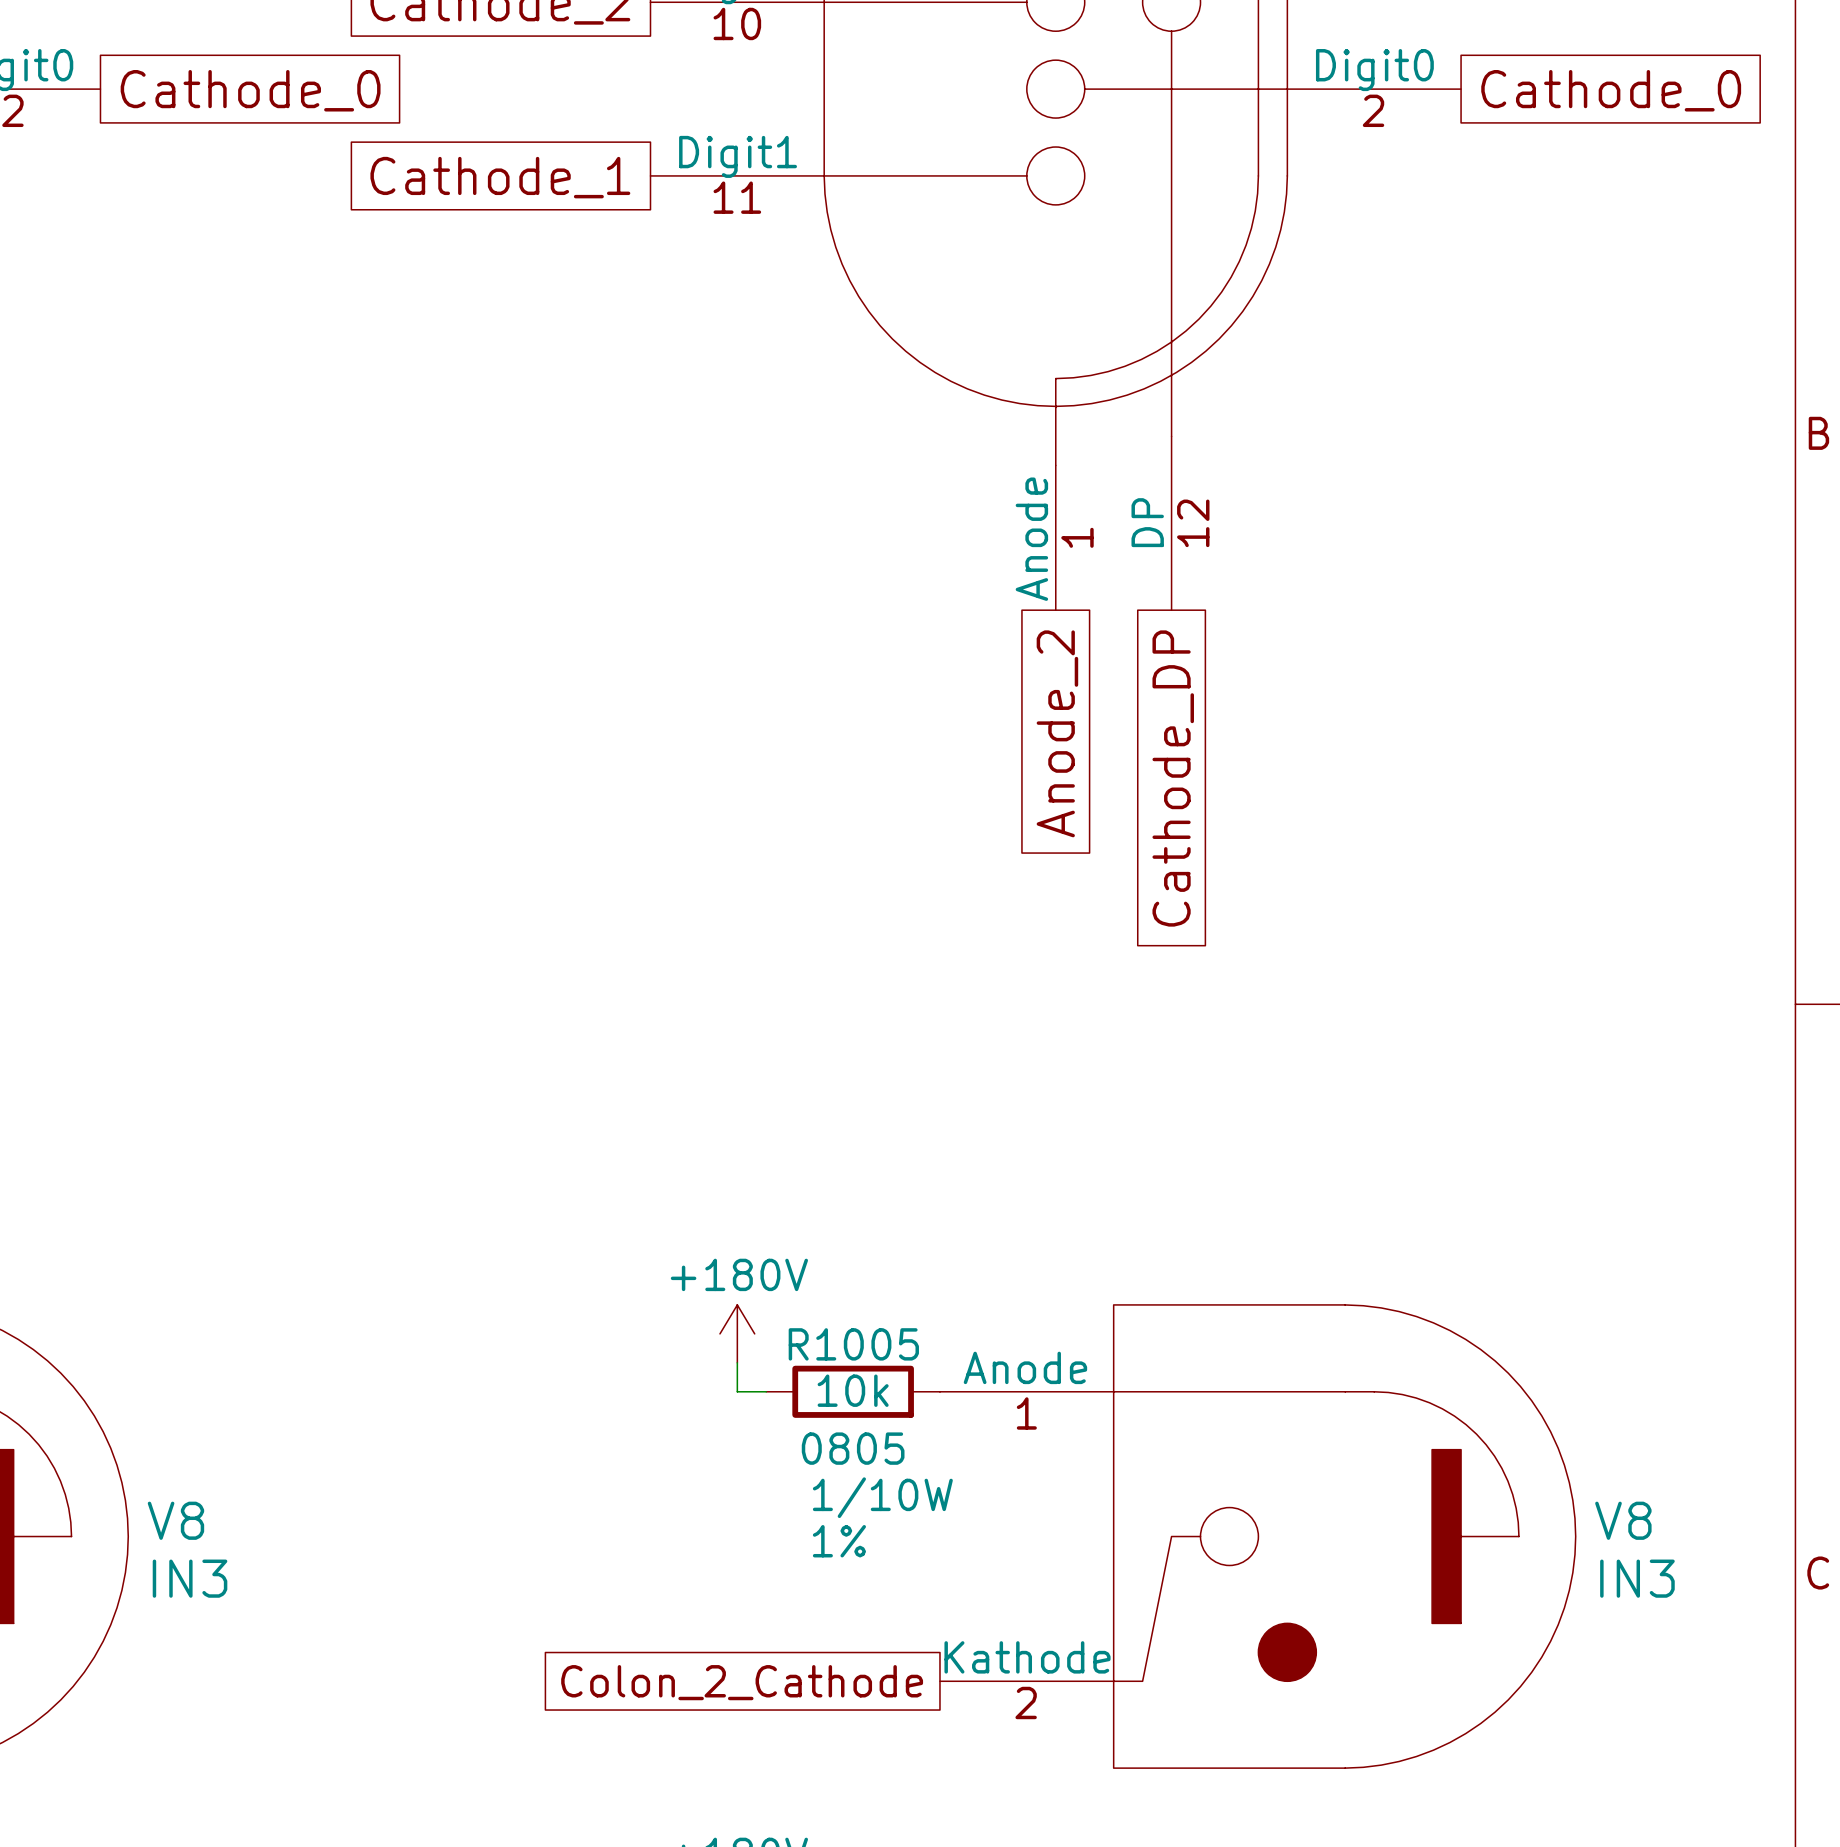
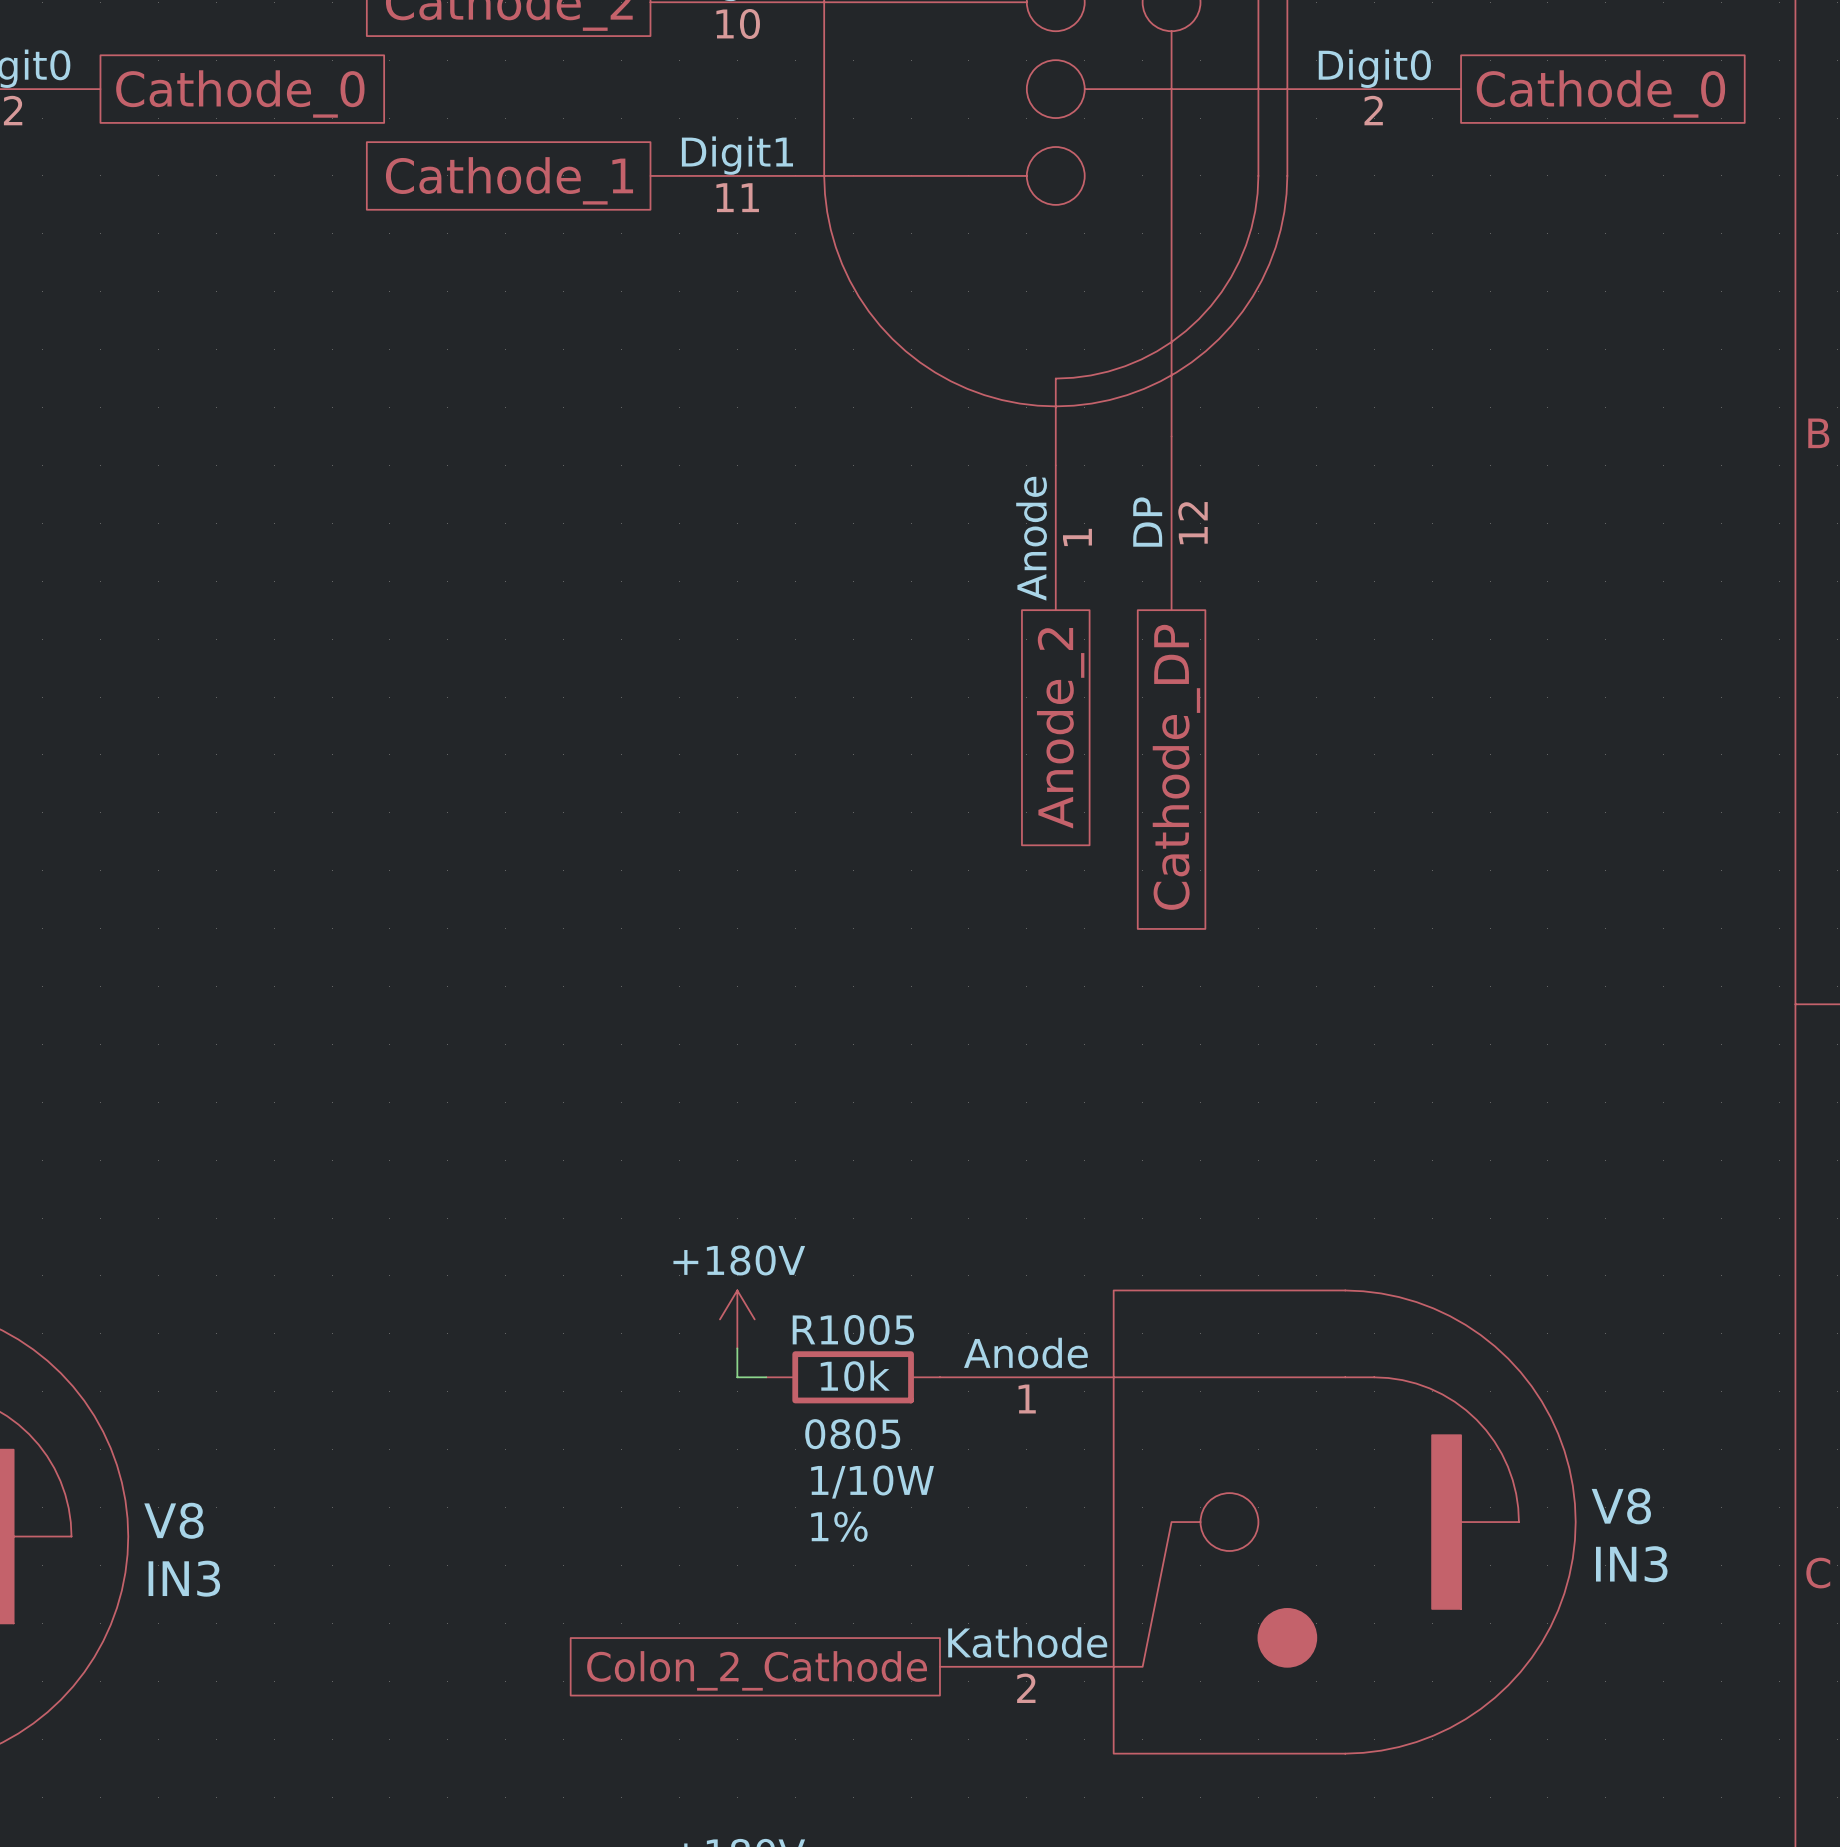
power symbol position: +180V (737, 1333) -> +180V (737, 1319)
wire: (737, 1377) (737, 1391) (766, 1391) -> (737, 1377) (766, 1377)
R1005 position: (853, 1391) -> (853, 1377)
V8 position: (1257, 1536) -> (1257, 1522)
global label position: Colon_2_Cathode (742, 1682) -> Colon_2_Cathode (757, 1670)

